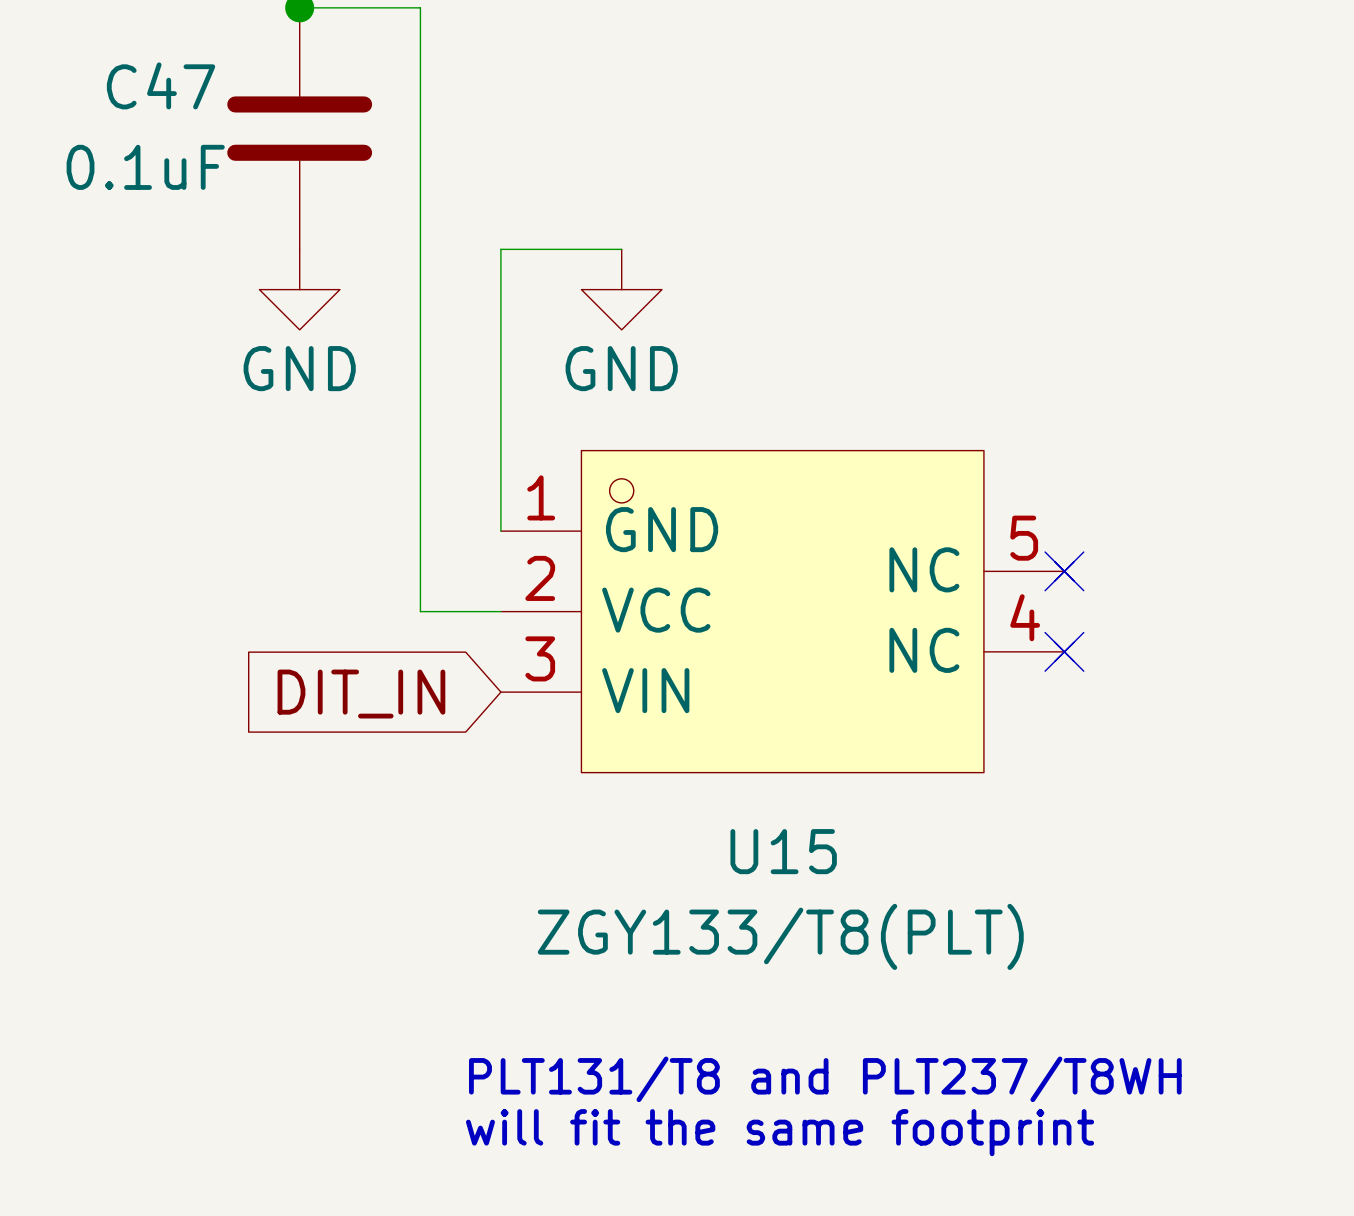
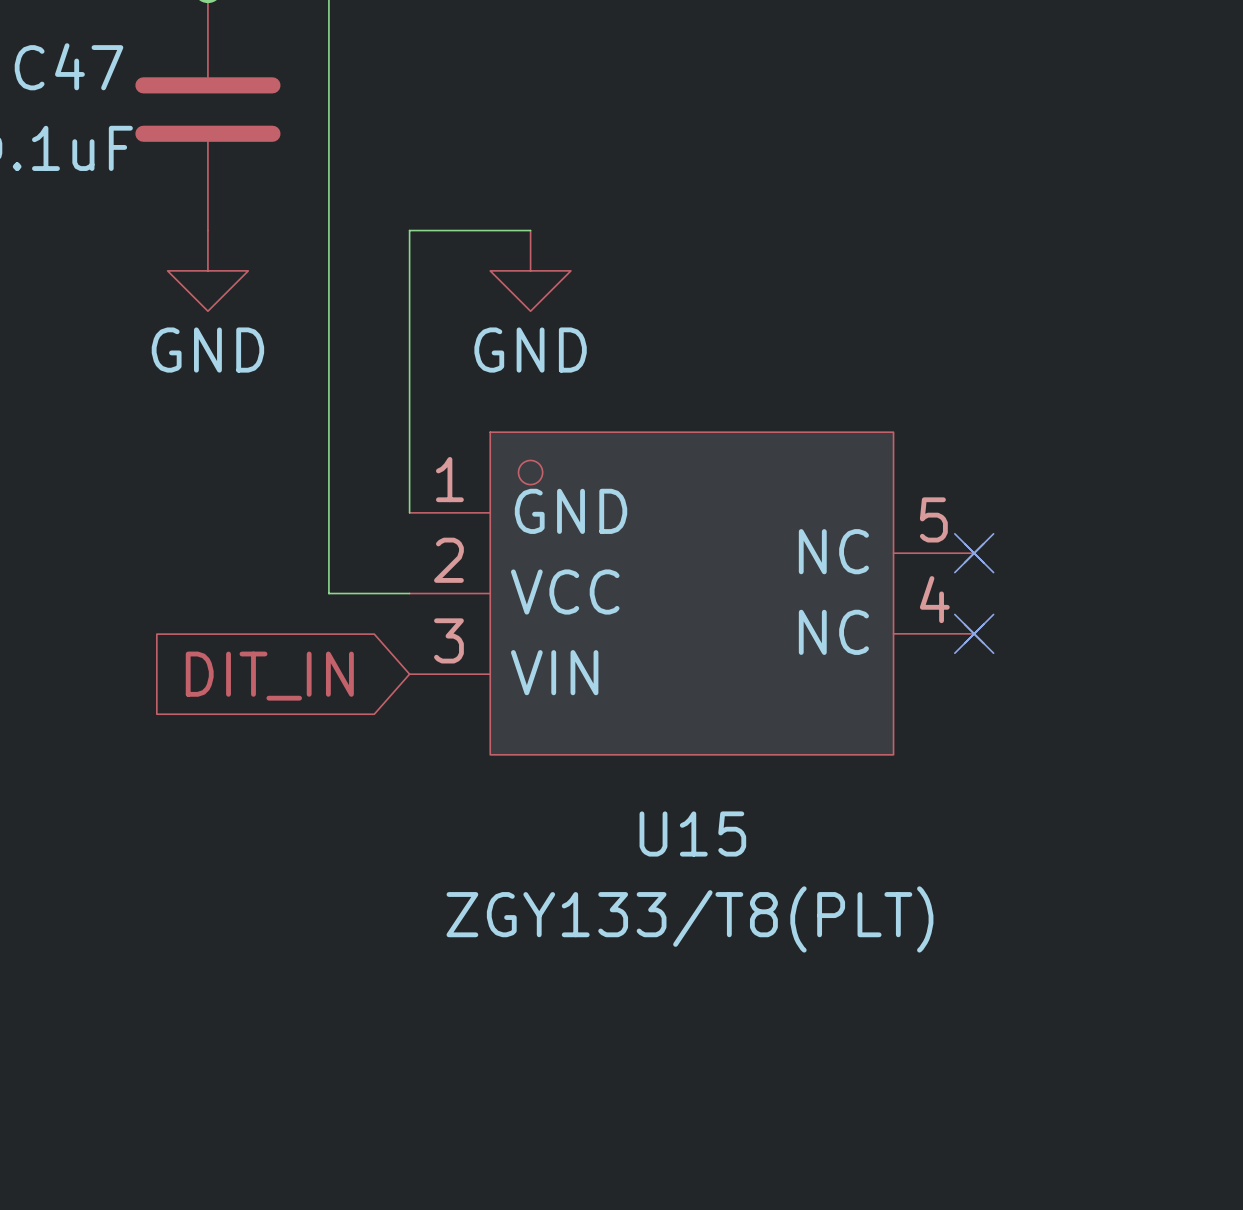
text: PLT131/T8 and PLT237/T8WH (825, 1079) -> none
text: will fit the same footprint (780, 1132) -> none

